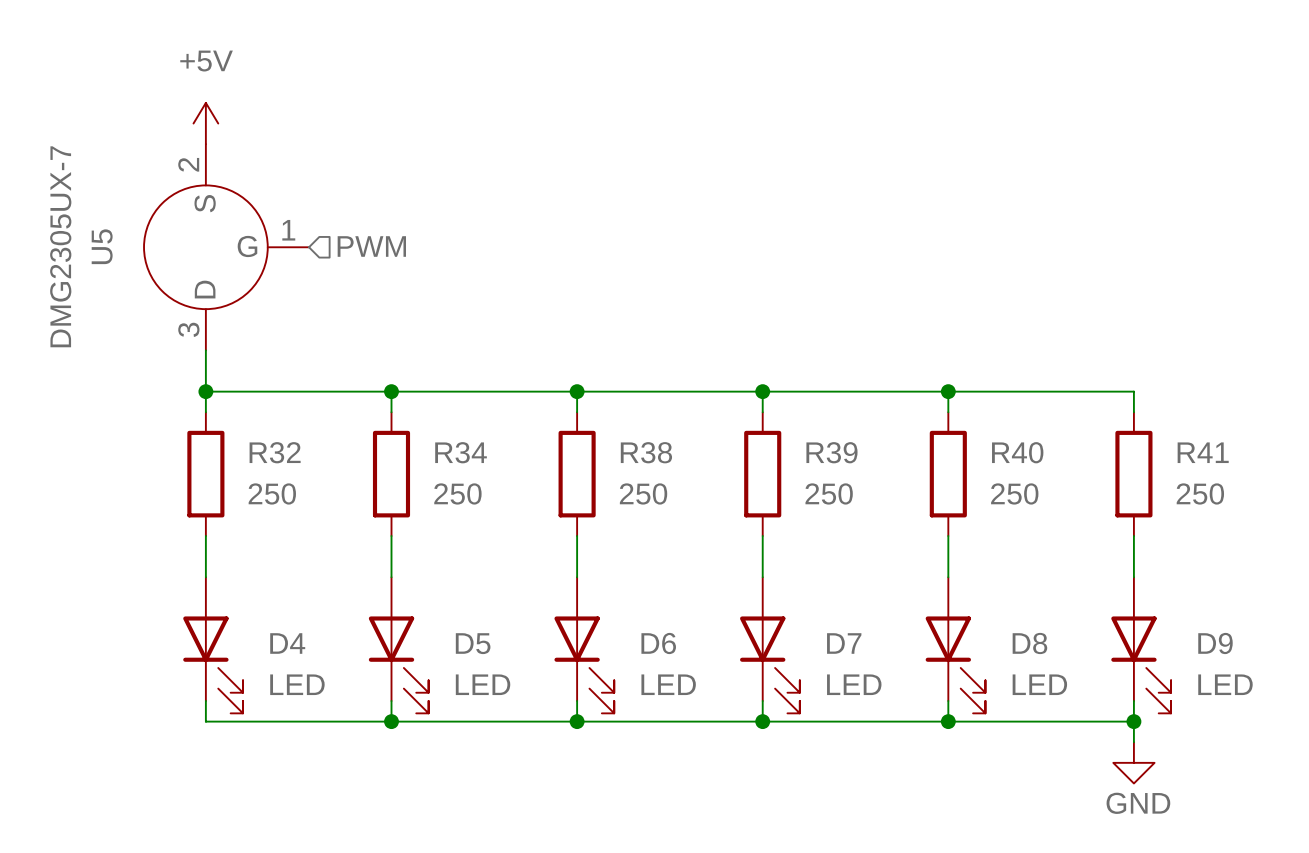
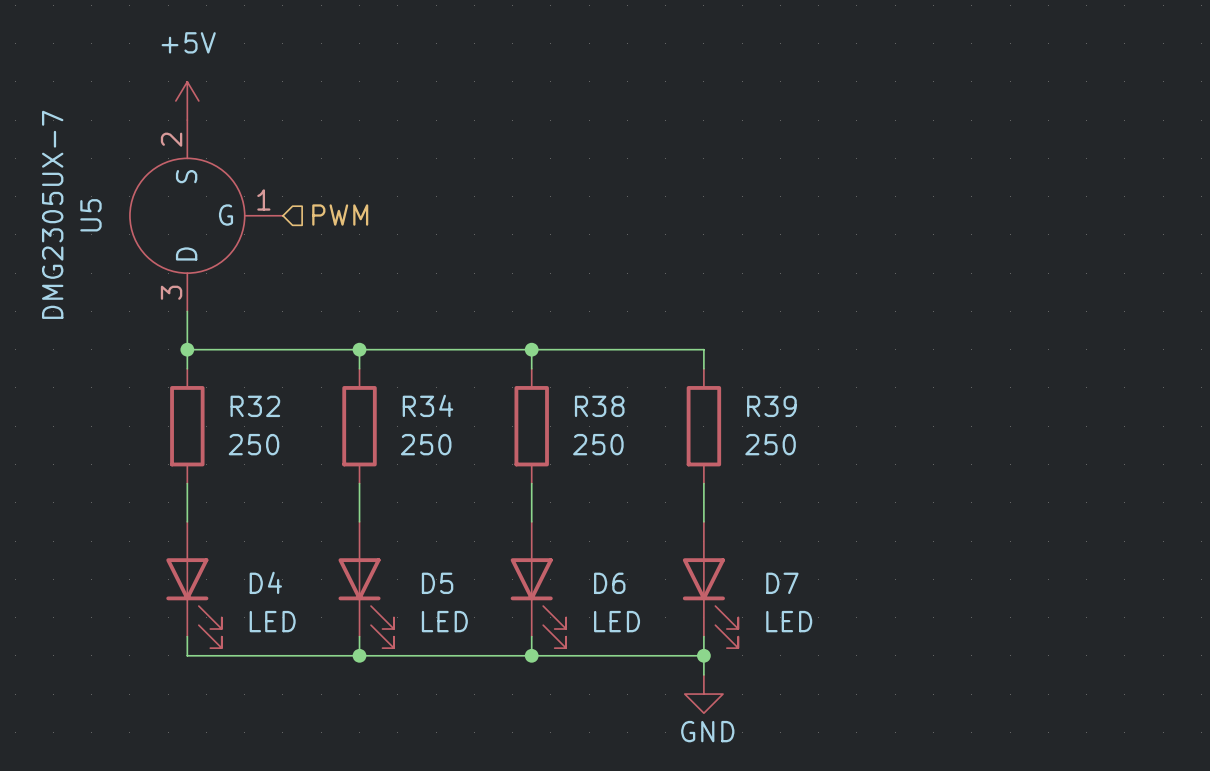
wire: (762, 391) (1133, 391) (1133, 412) -> none
junction: (762, 391) -> none
wire: (948, 391) (948, 412) -> none
junction: (948, 391) -> none
R40: 250 (948, 474) -> none
R41: 250 (1133, 474) -> none
wire: (948, 536) (948, 577) -> none
wire: (1133, 536) (1133, 577) -> none
D8: LED (955, 645) -> none
D9: LED (1141, 645) -> none
wire: (948, 700) (948, 721) -> none
wire: (1133, 700) (1133, 742) -> none
wire: (762, 721) (1133, 721) -> (703, 655) (703, 674)
junction: (948, 721) -> none
junction: (1133, 721) -> none
power symbol position: GND (1133, 762) -> GND (703, 694)

